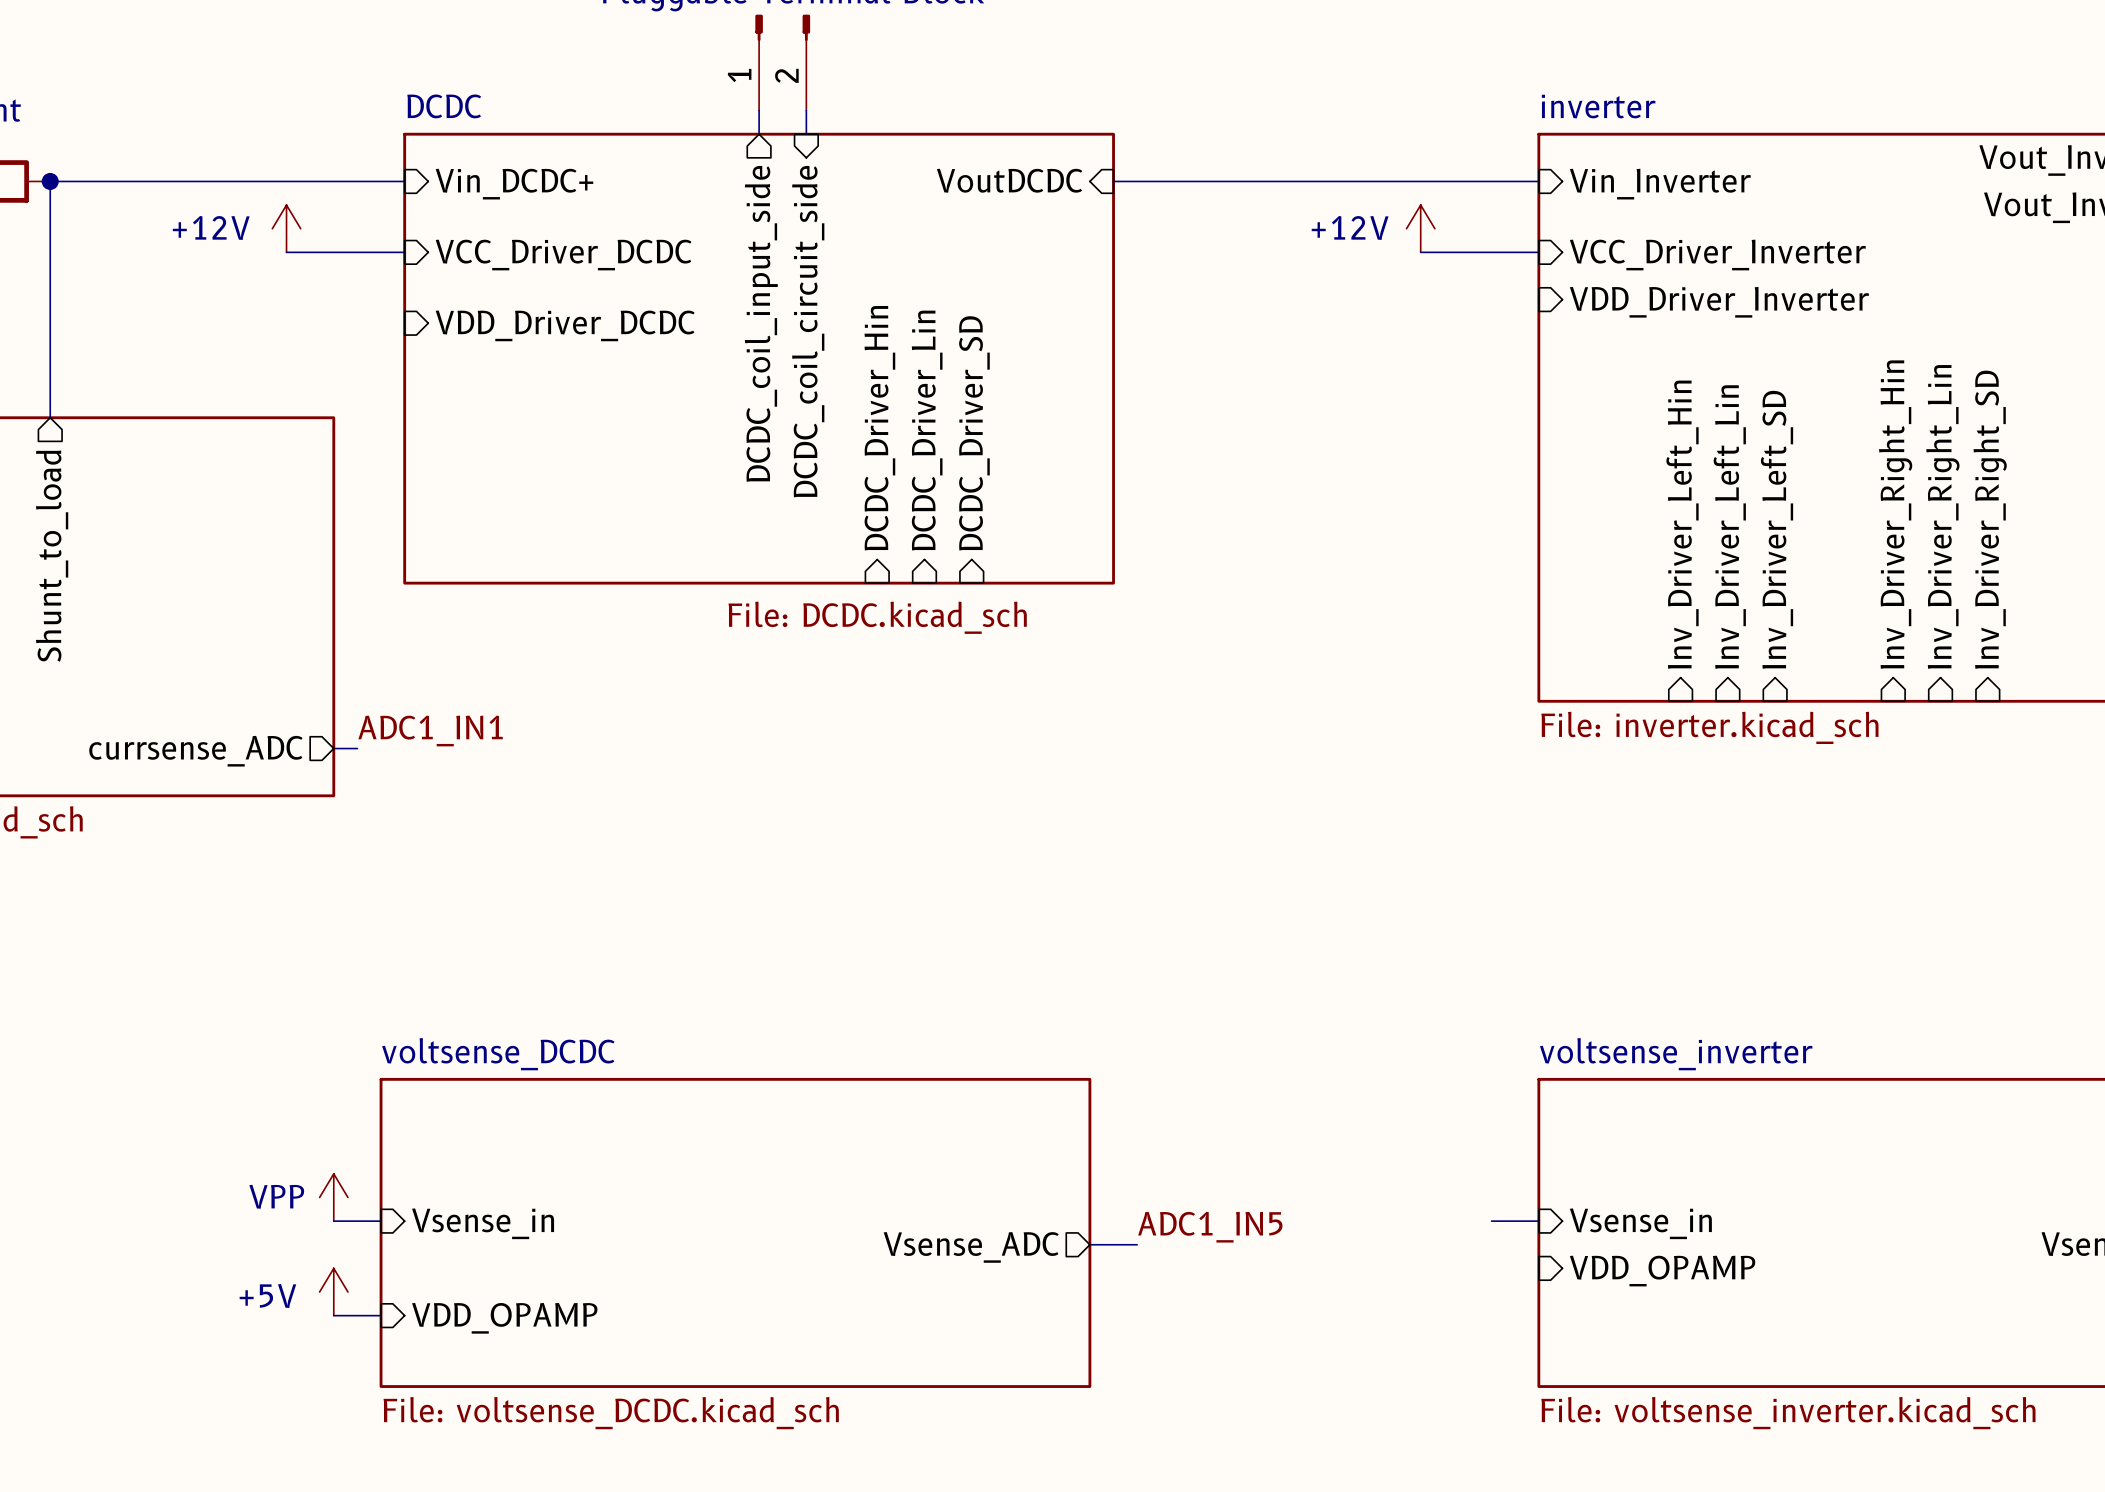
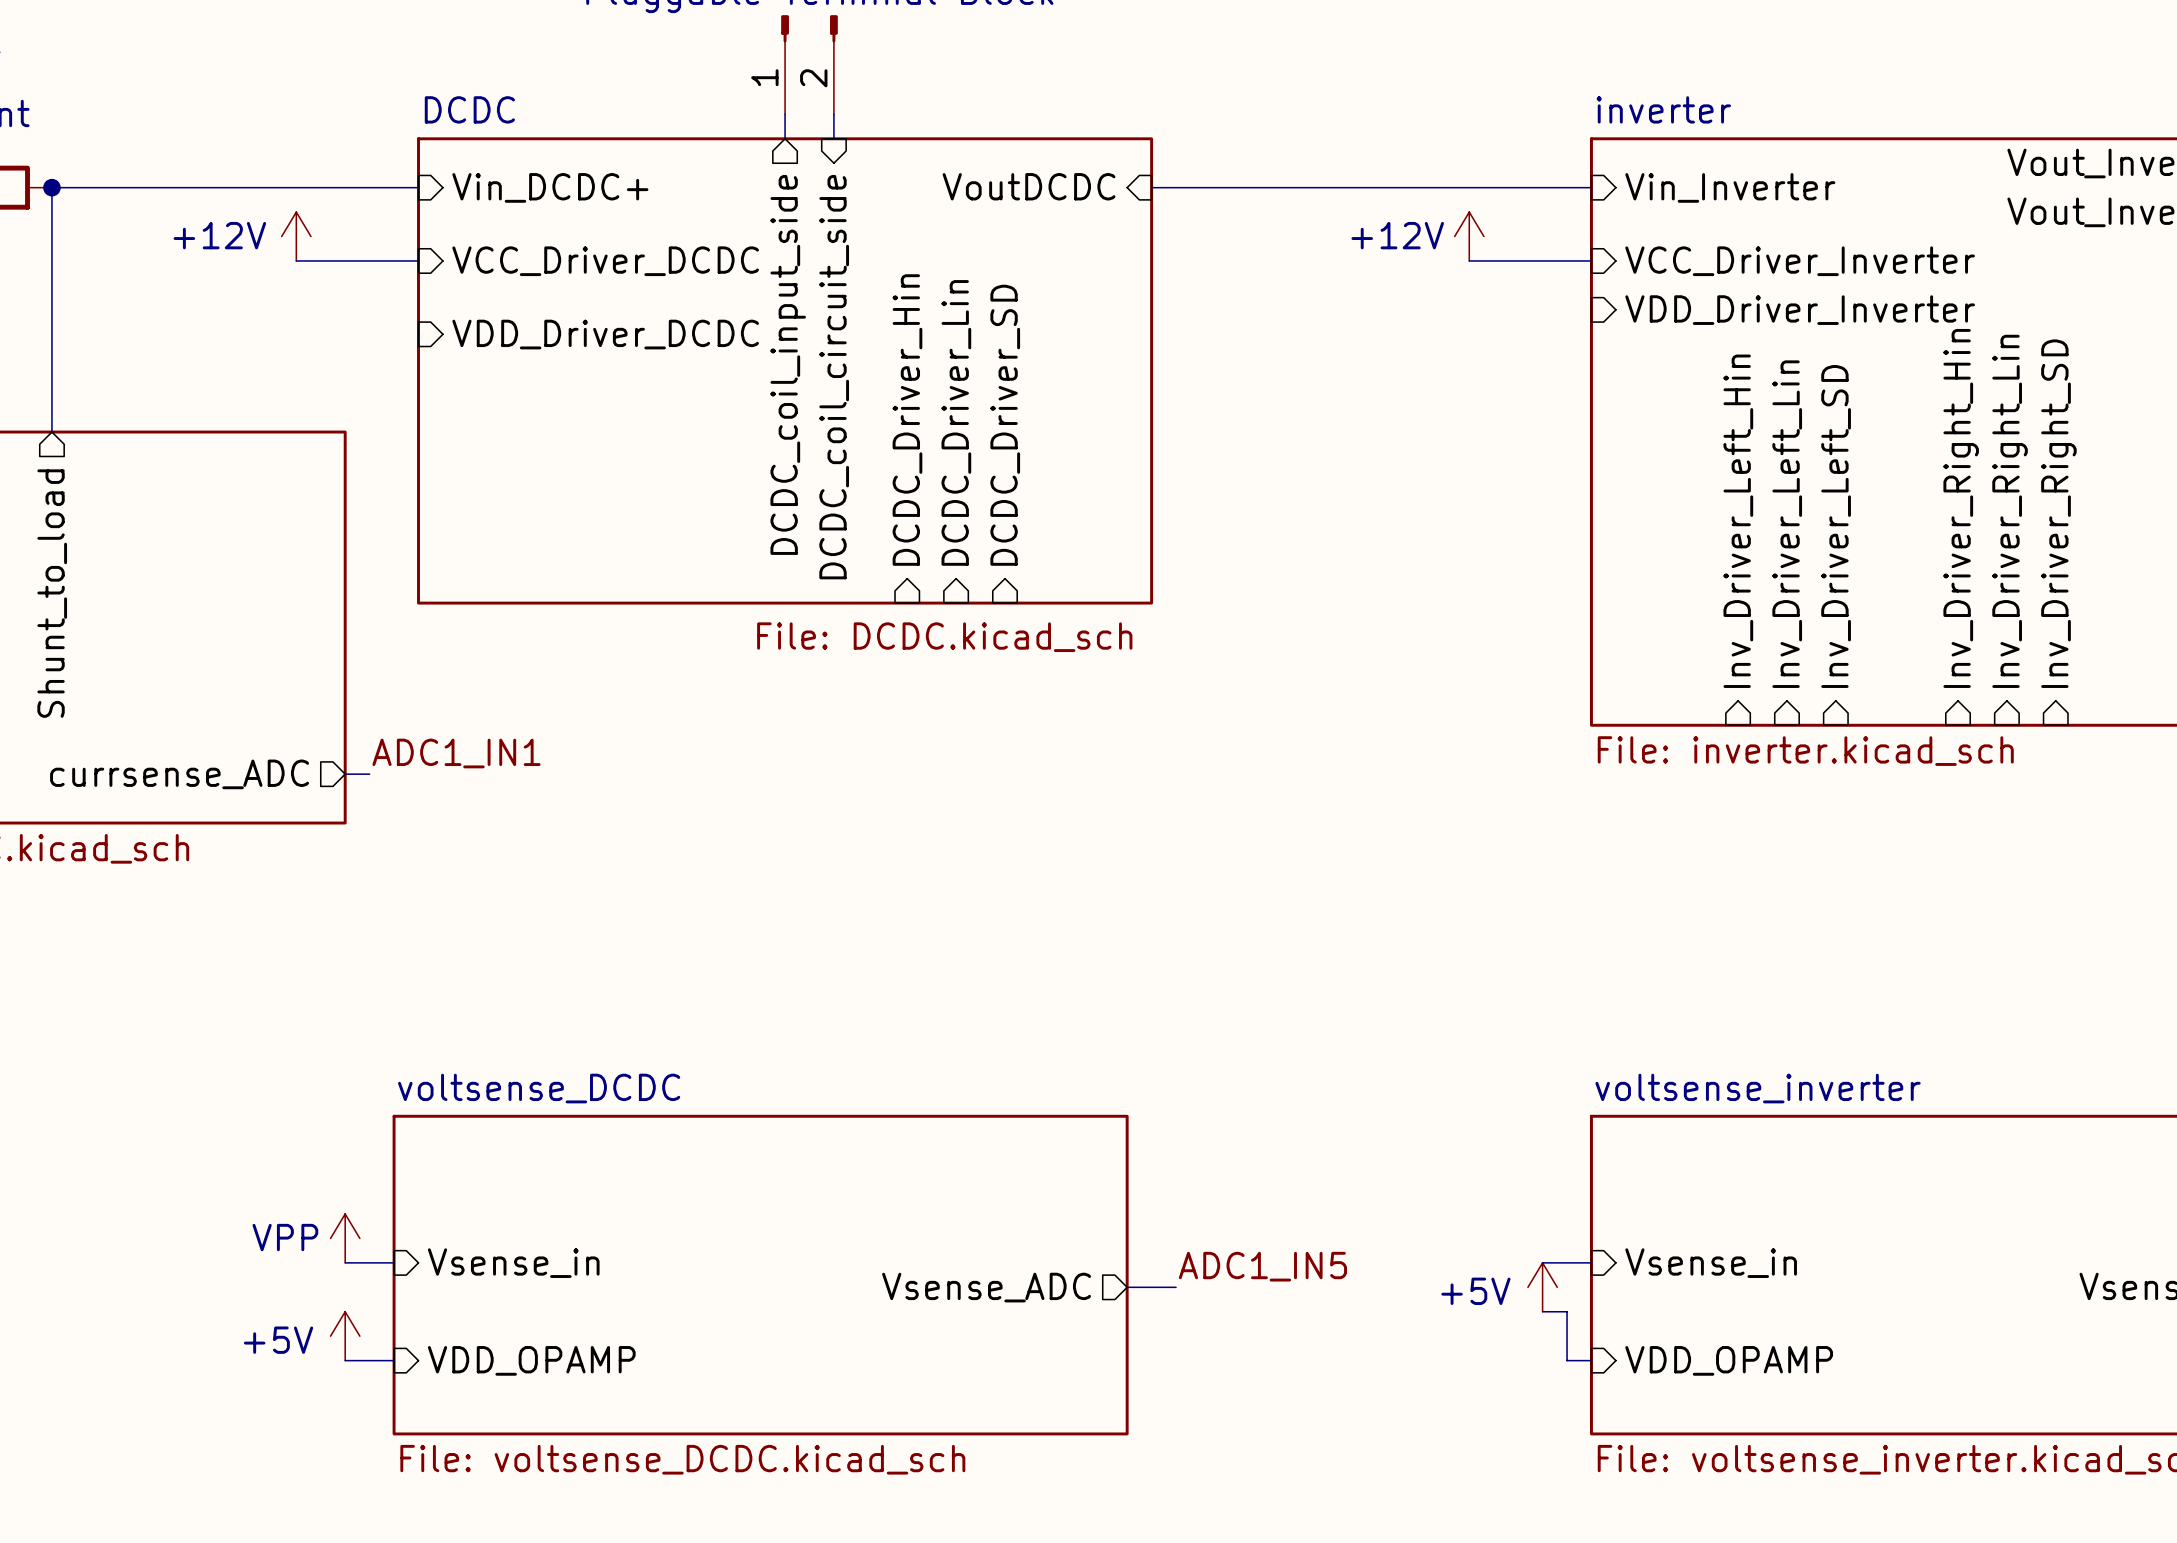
power symbol: none -> +5V (1542, 1287)
wire: none -> (1542, 1311) (1567, 1311) (1567, 1360) (1591, 1360)
sheet pin position: VDD_OPAMP (1662, 1271) -> VDD_OPAMP (1729, 1360)

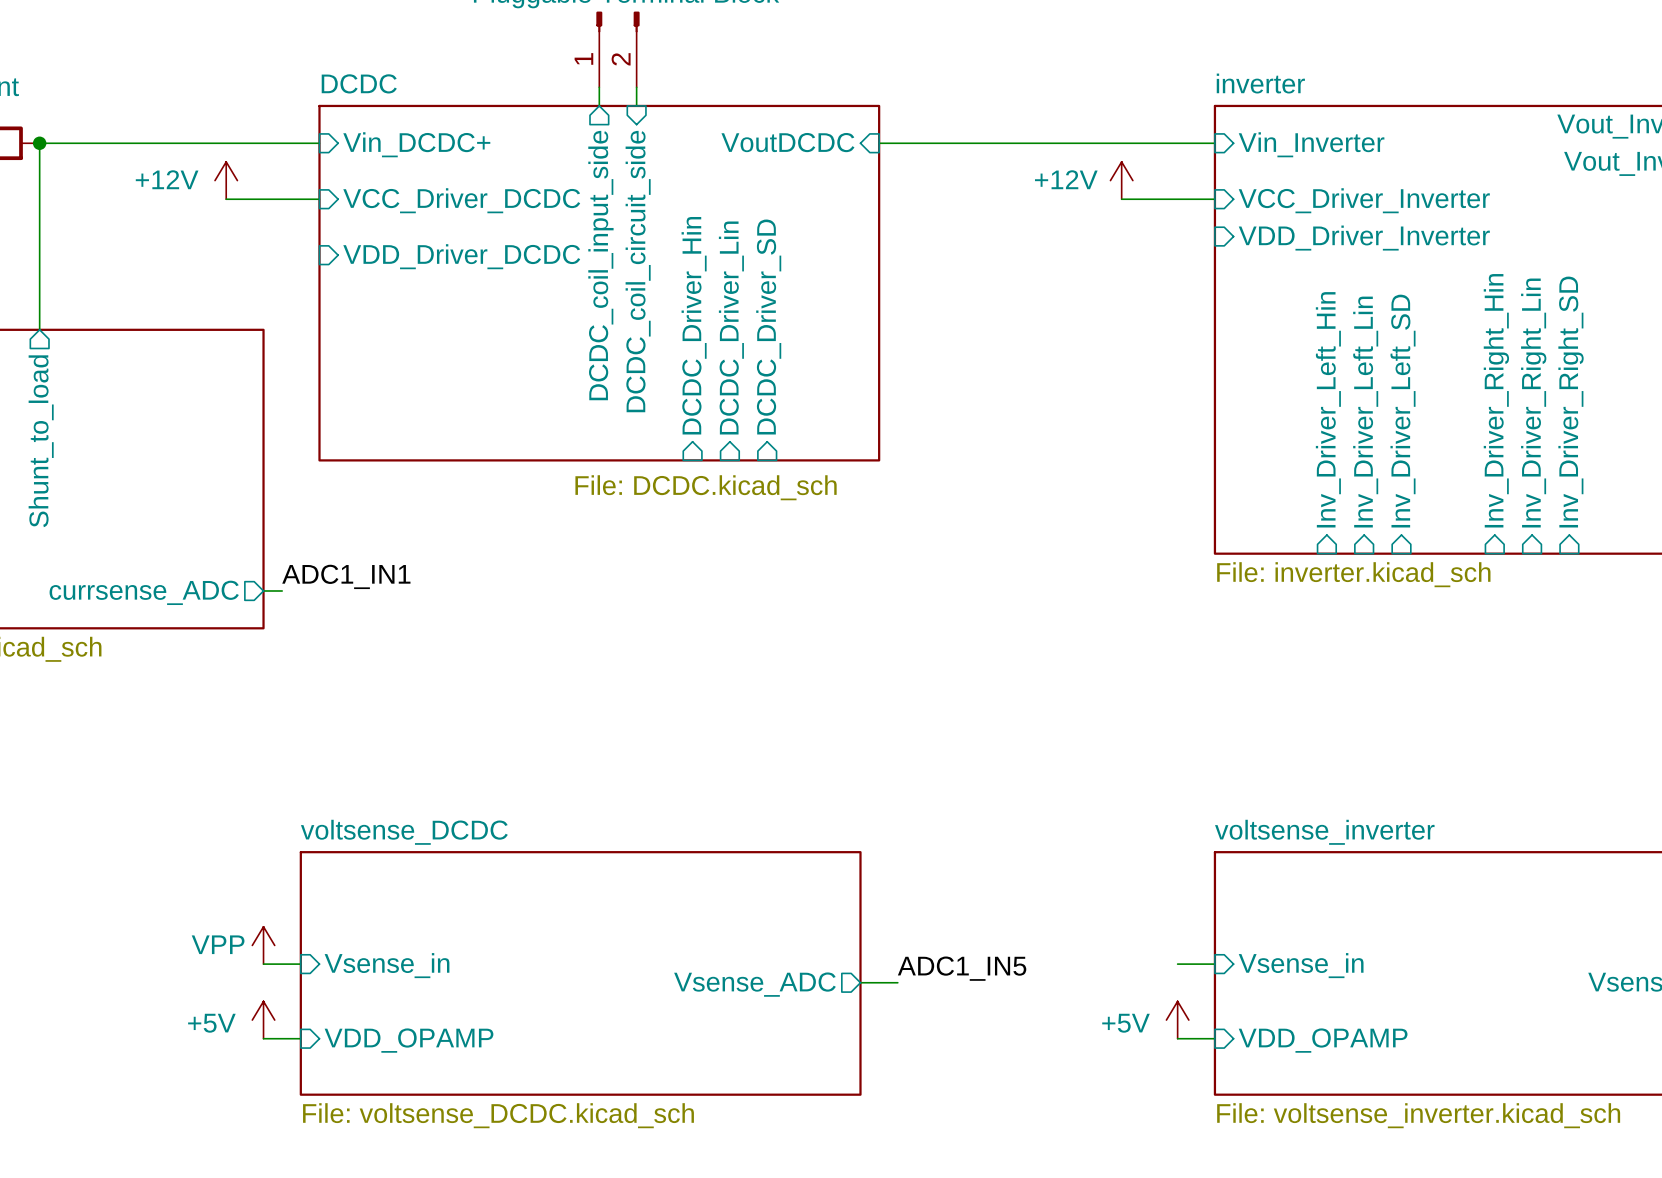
power symbol position: +5V (1542, 1287) -> +5V (1177, 1020)
wire: (1542, 1311) (1567, 1311) (1567, 1360) -> (1177, 1038) (1196, 1038)

